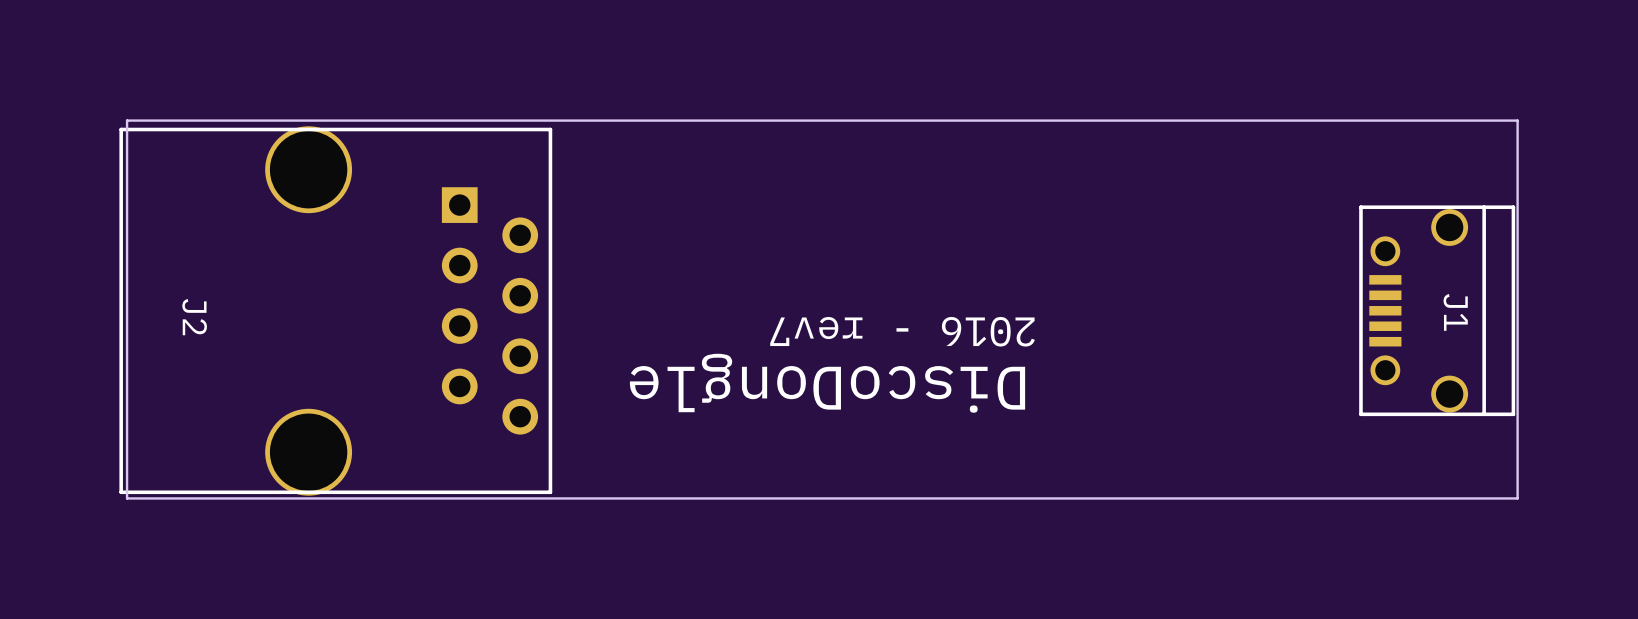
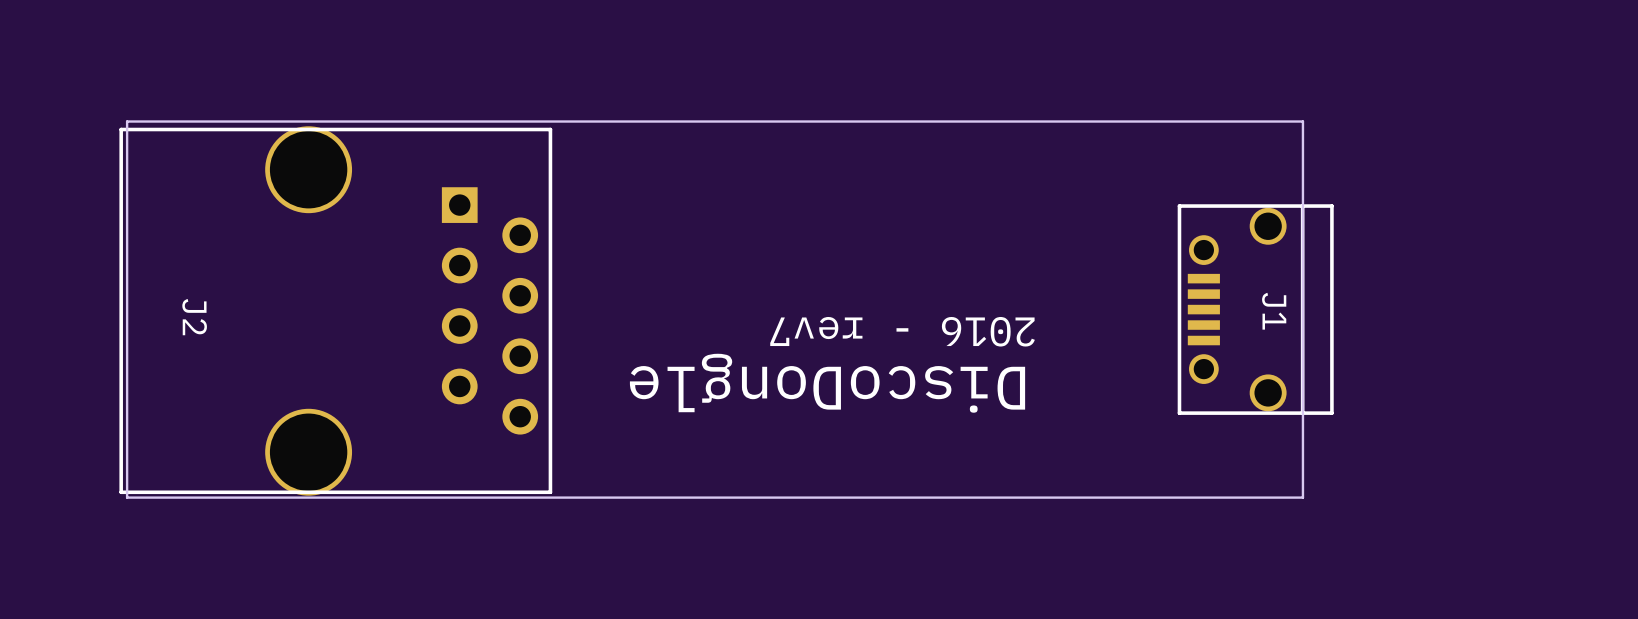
board edge: (127, 121) (1517, 120) (1517, 498) (127, 497) -> (127, 121) (1302, 121) (1302, 497) (127, 497)
J1 position: (1437, 310) -> (1255, 309)

